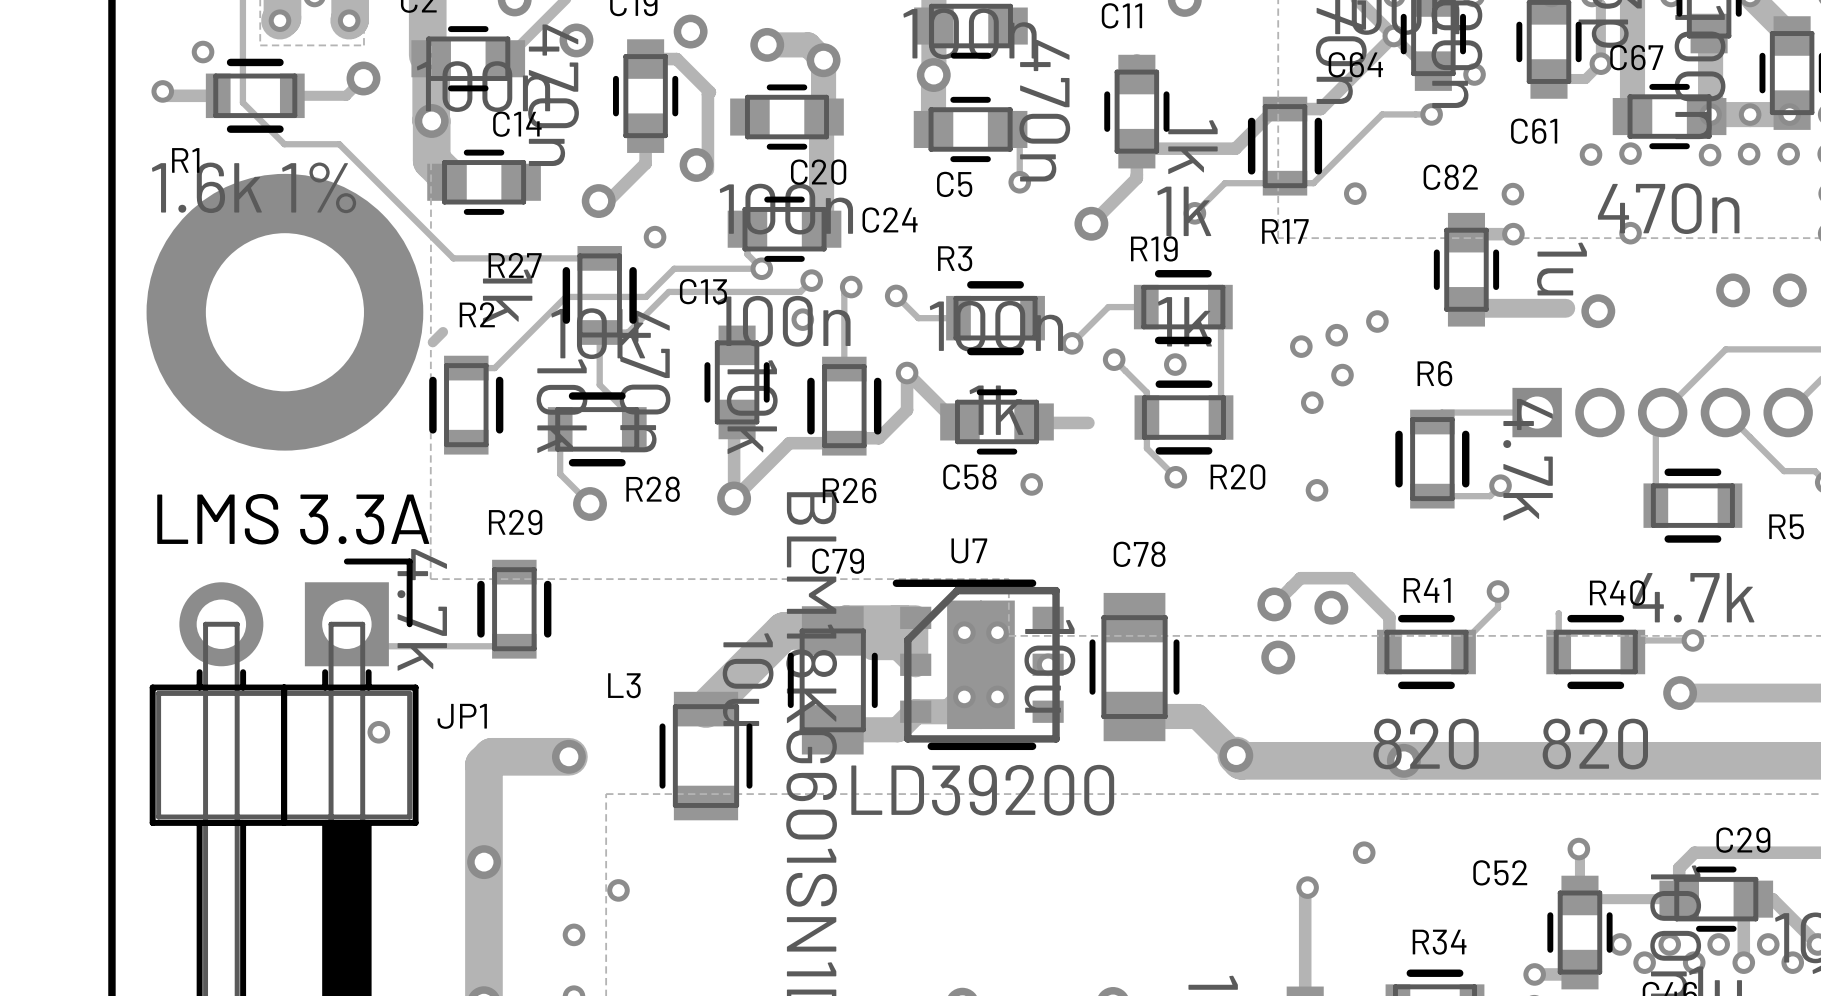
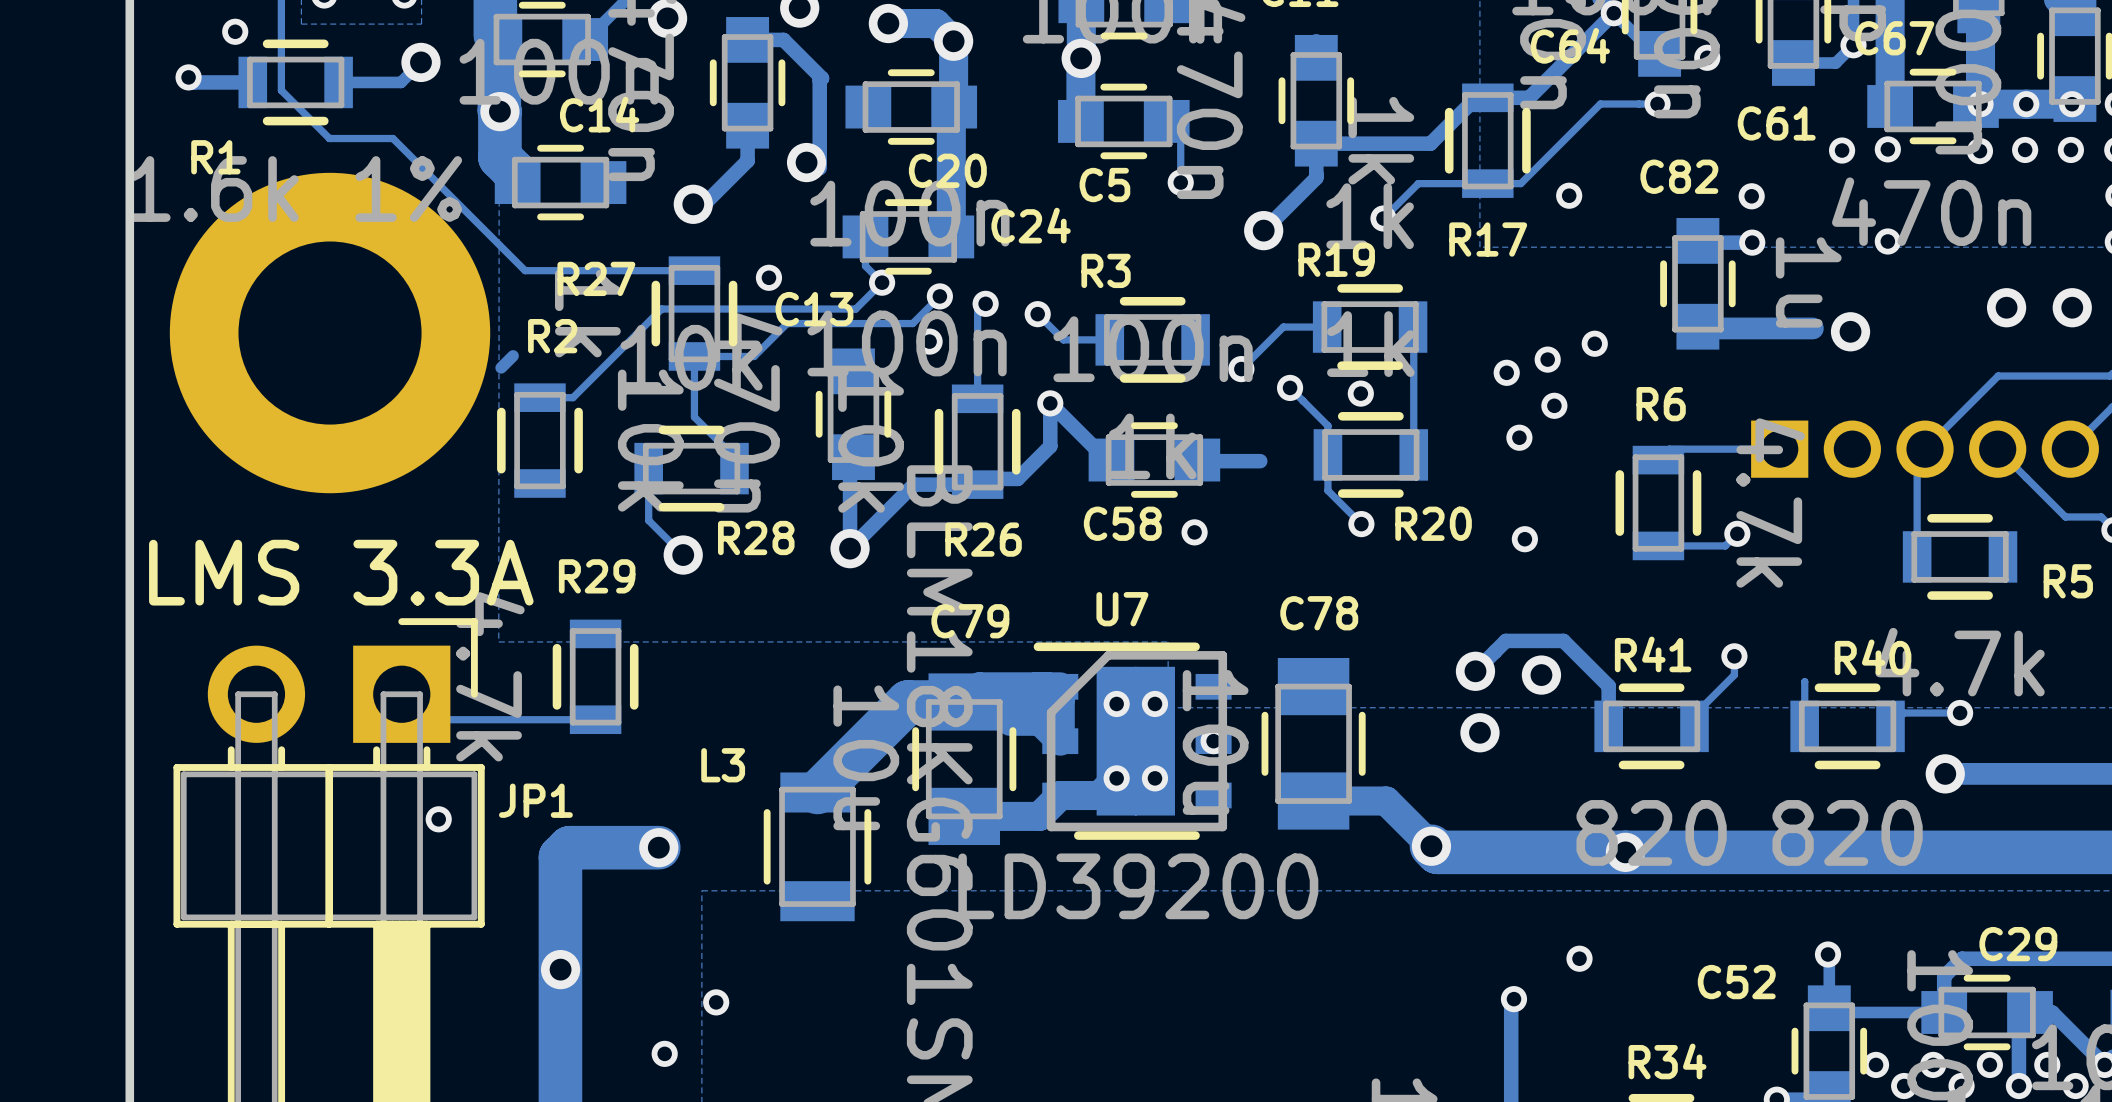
via position: (655, 237) -> (768, 277)
track: (761, 268) (674, 268) (646, 296) (565, 296) -> (882, 282) (855, 309) (661, 309) (655, 315)
track: (800, 291) (668, 291) (628, 332) -> (926, 309) (912, 323) (787, 323) (754, 356) (727, 356)

